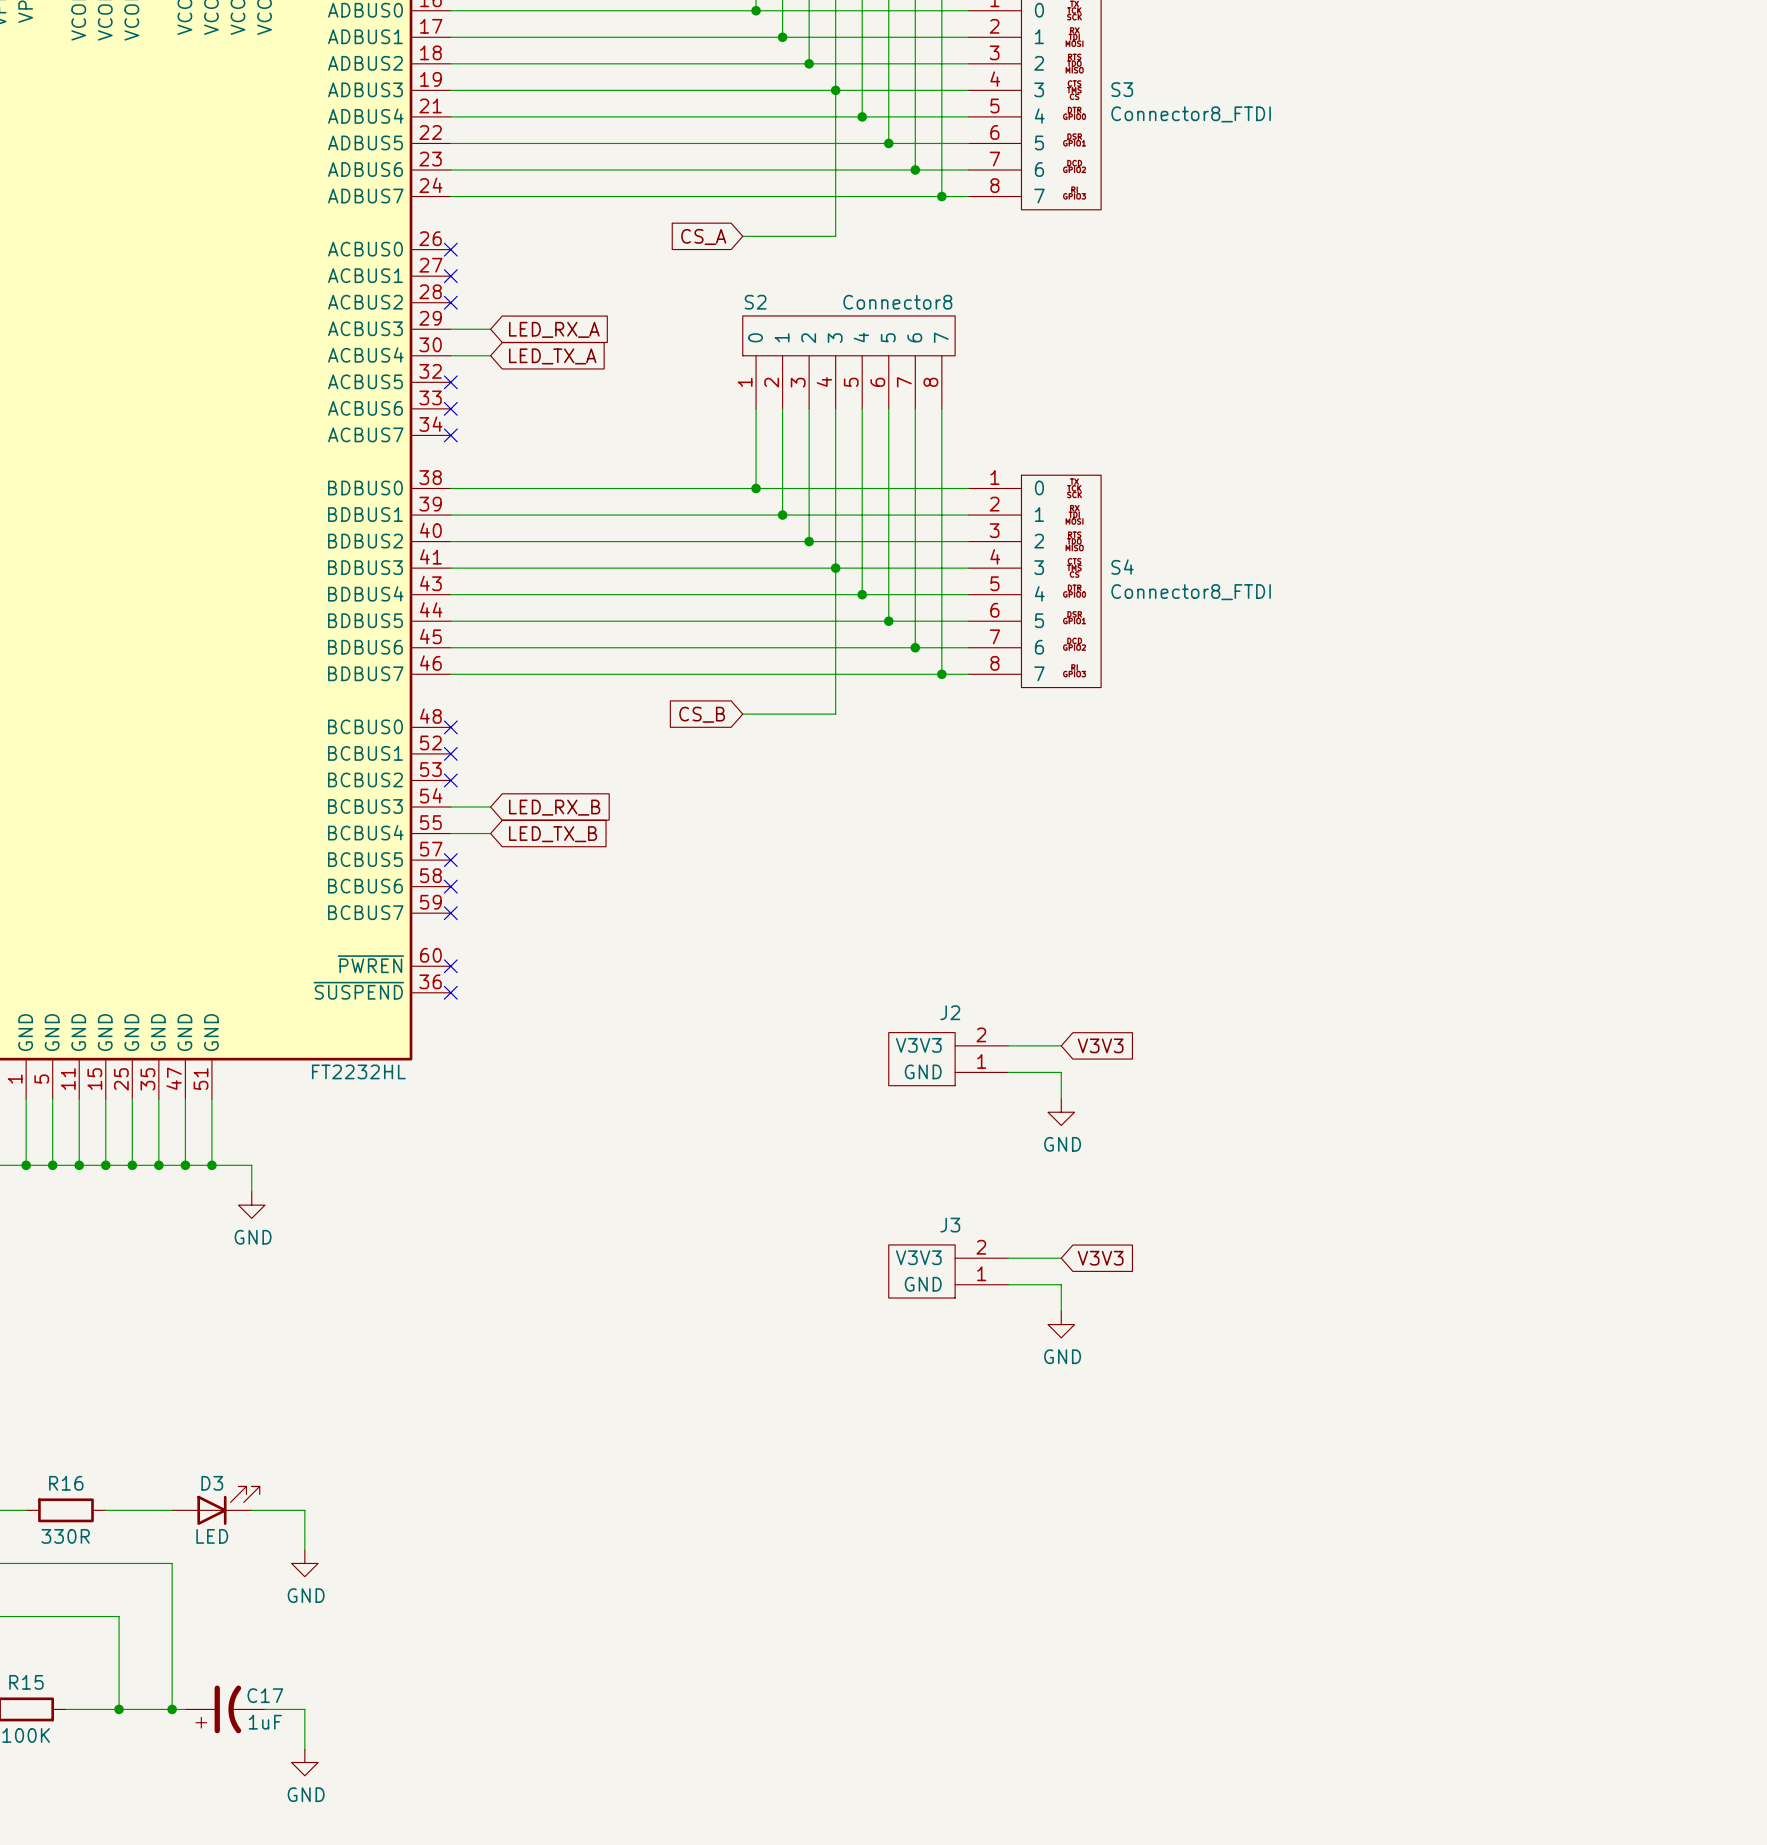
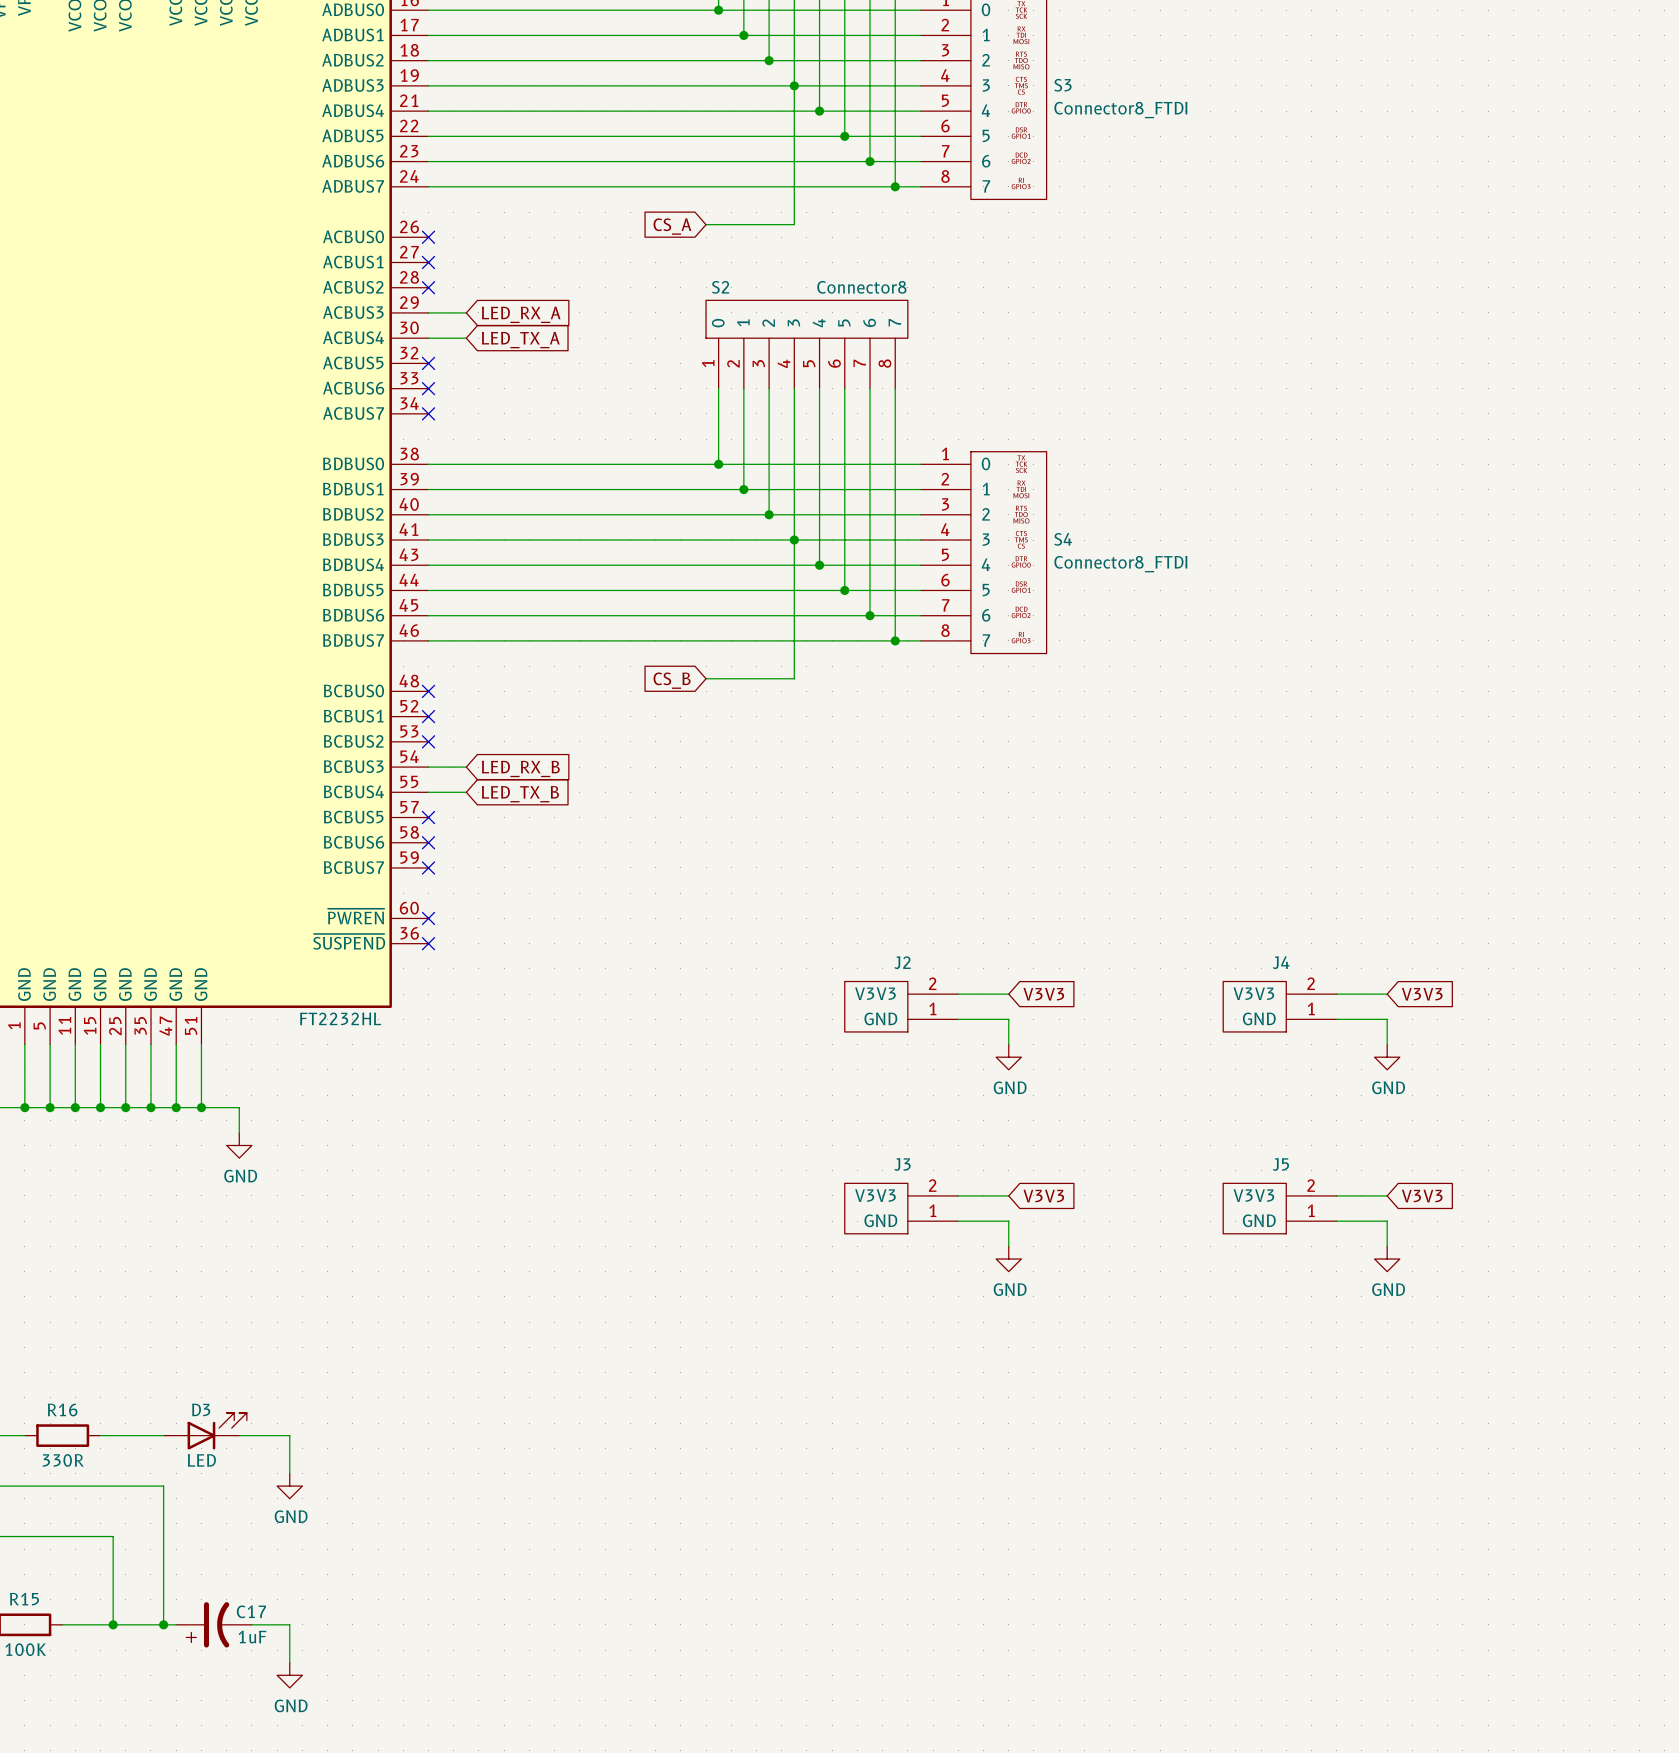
wire: none -> (1336, 994) (1387, 994)
global label: none -> V3V3 (1422, 994)
J4: none -> (1279, 1006)
wire: none -> (1336, 1019) (1387, 1019) (1387, 1044)
power symbol: none -> GND (1387, 1057)
wire: none -> (1336, 1195) (1387, 1195)
global label: none -> V3V3 (1422, 1196)
J5: none -> (1279, 1208)
wire: none -> (1336, 1221) (1387, 1221) (1387, 1246)
power symbol: none -> GND (1387, 1259)

